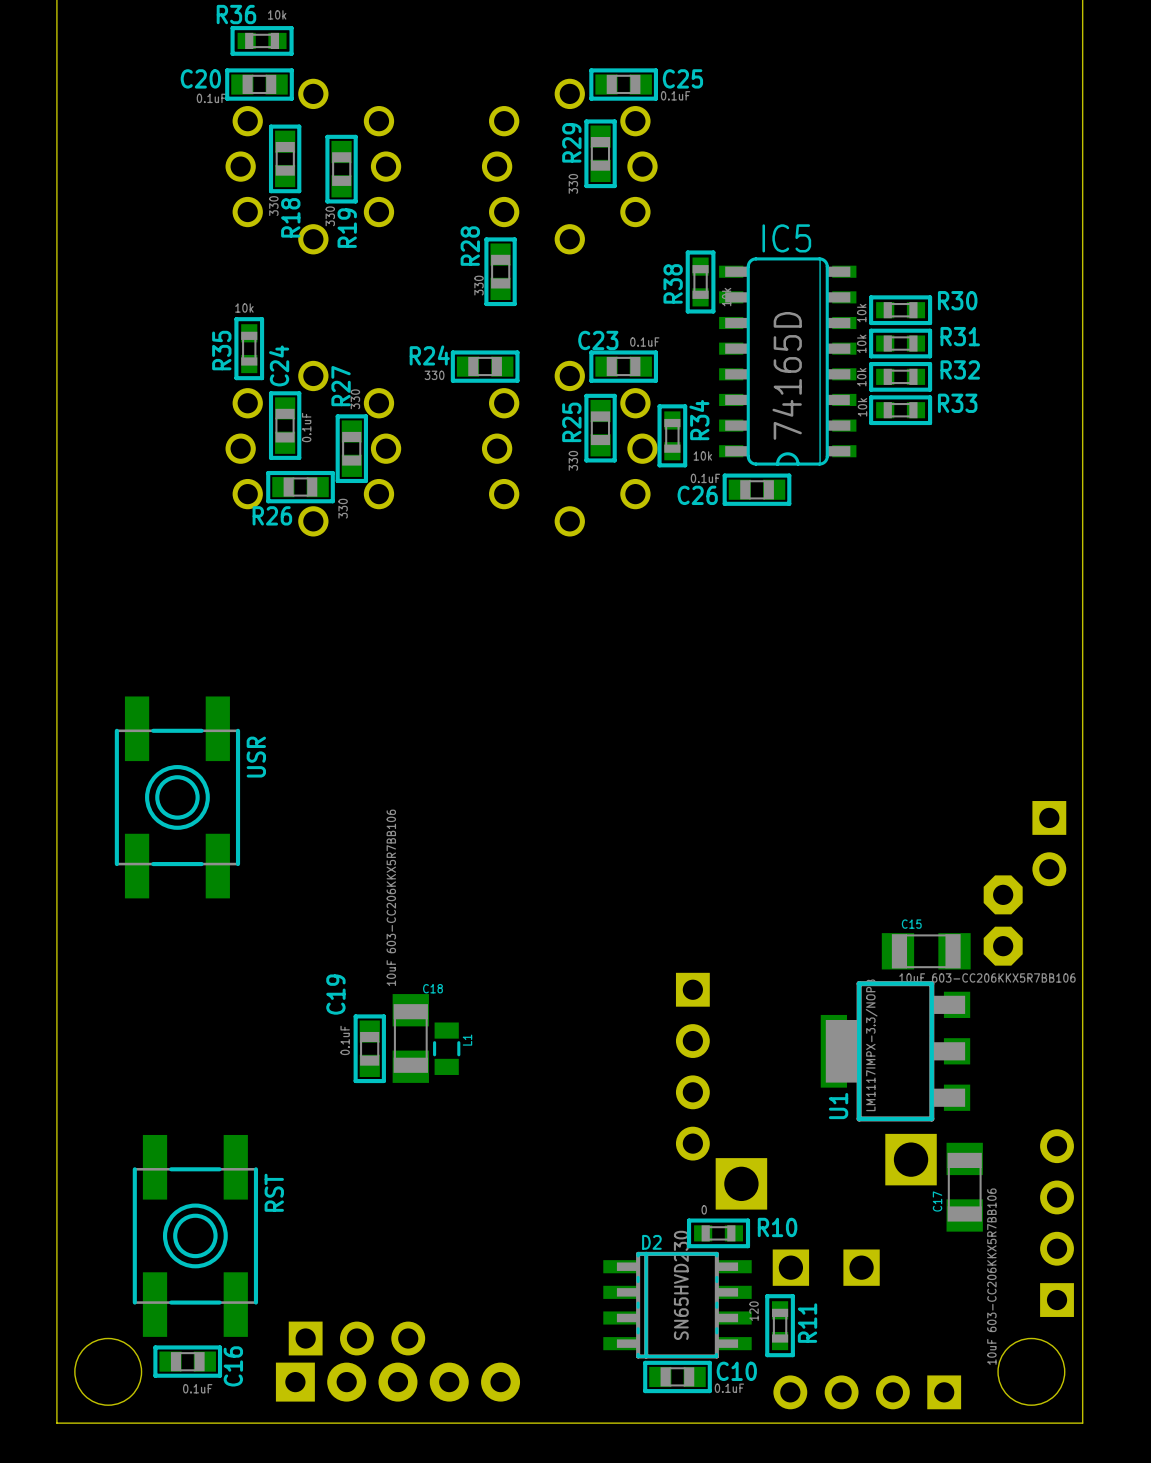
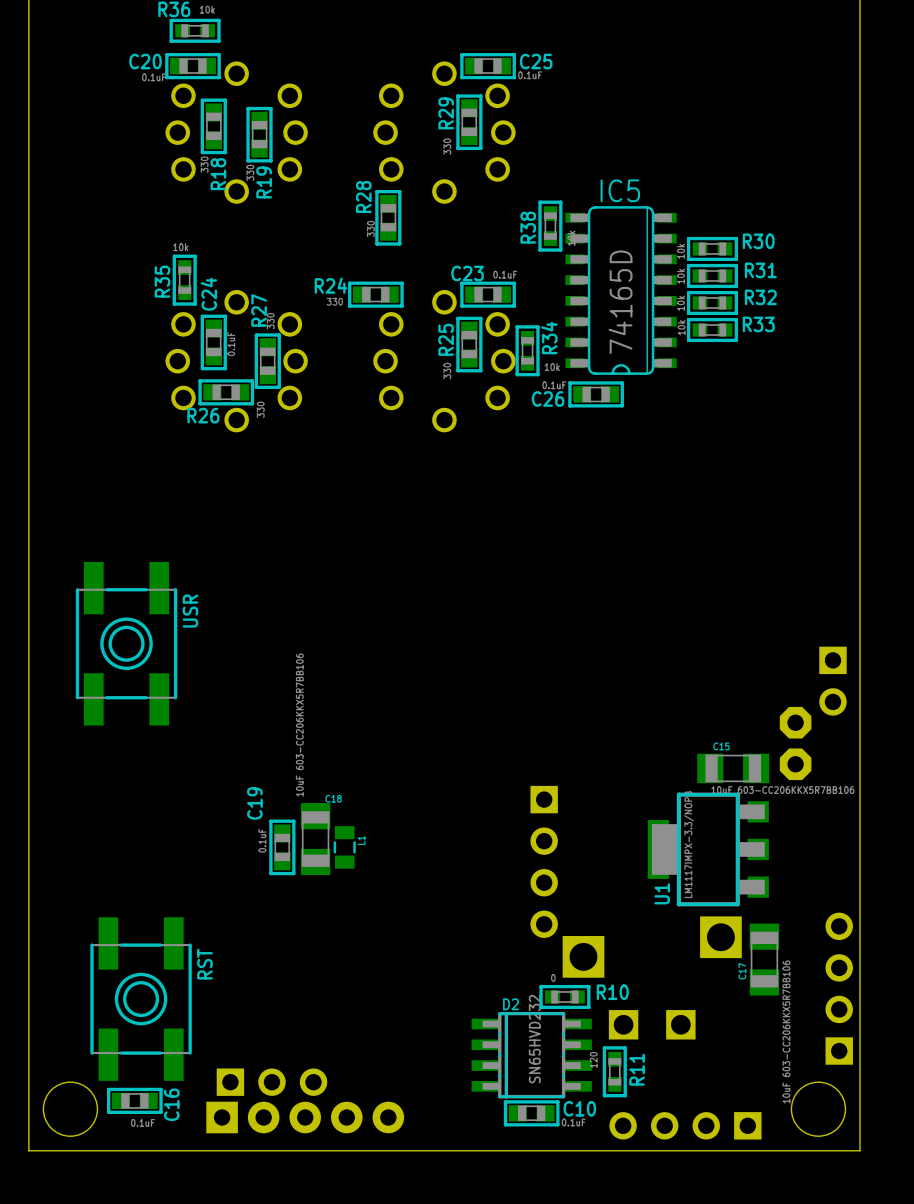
D2 value: SN65HVD230 (681, 1285) -> SN65HVD232 (534, 1039)

